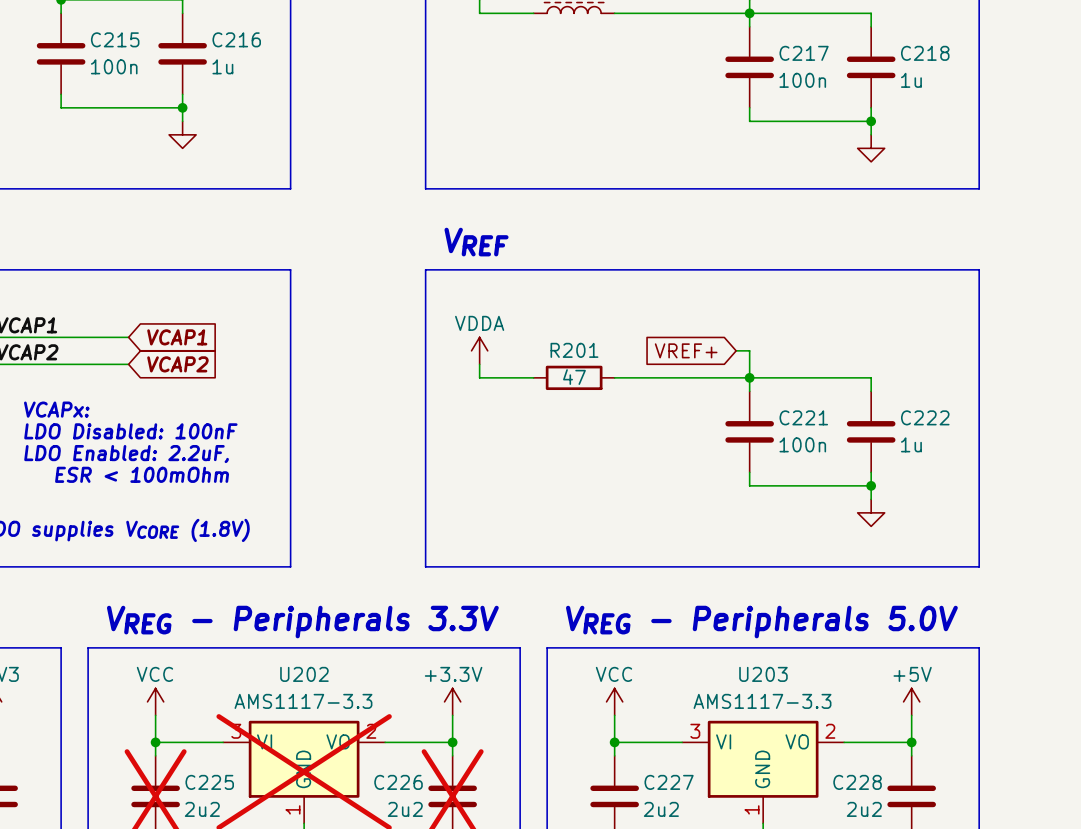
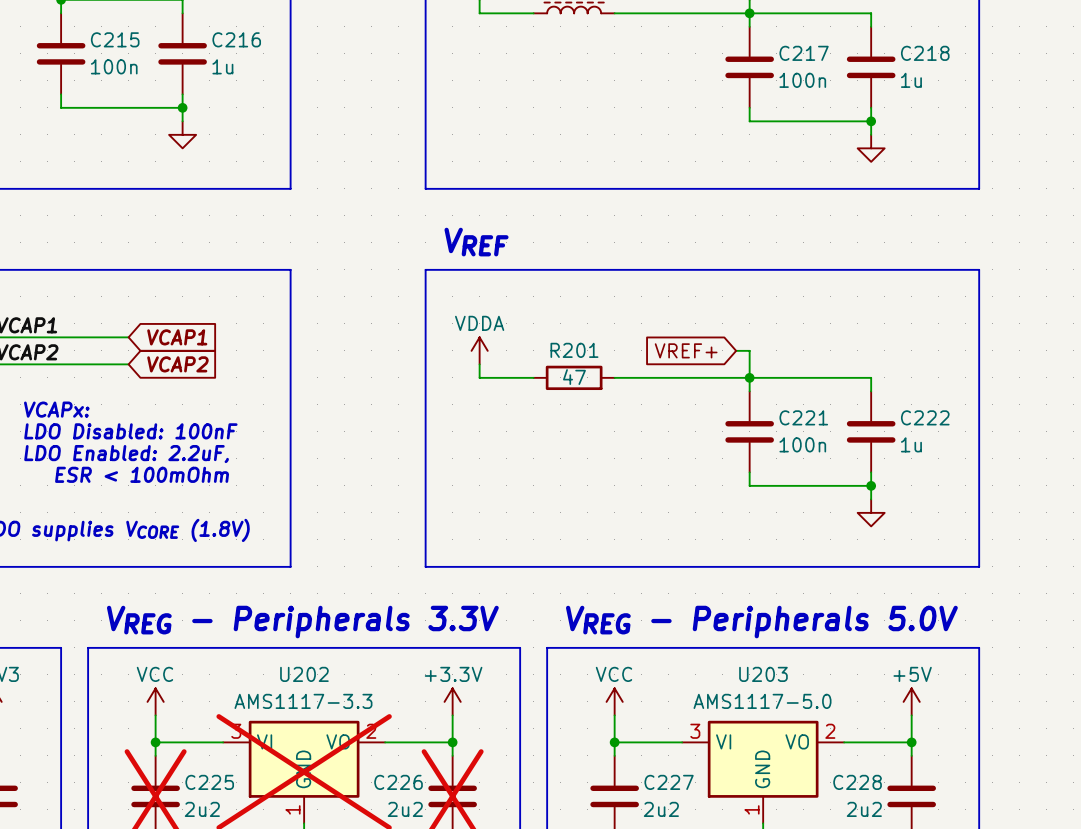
U203 value: AMS1117-3.3 (762, 701) -> AMS1117-5.0 (762, 701)

